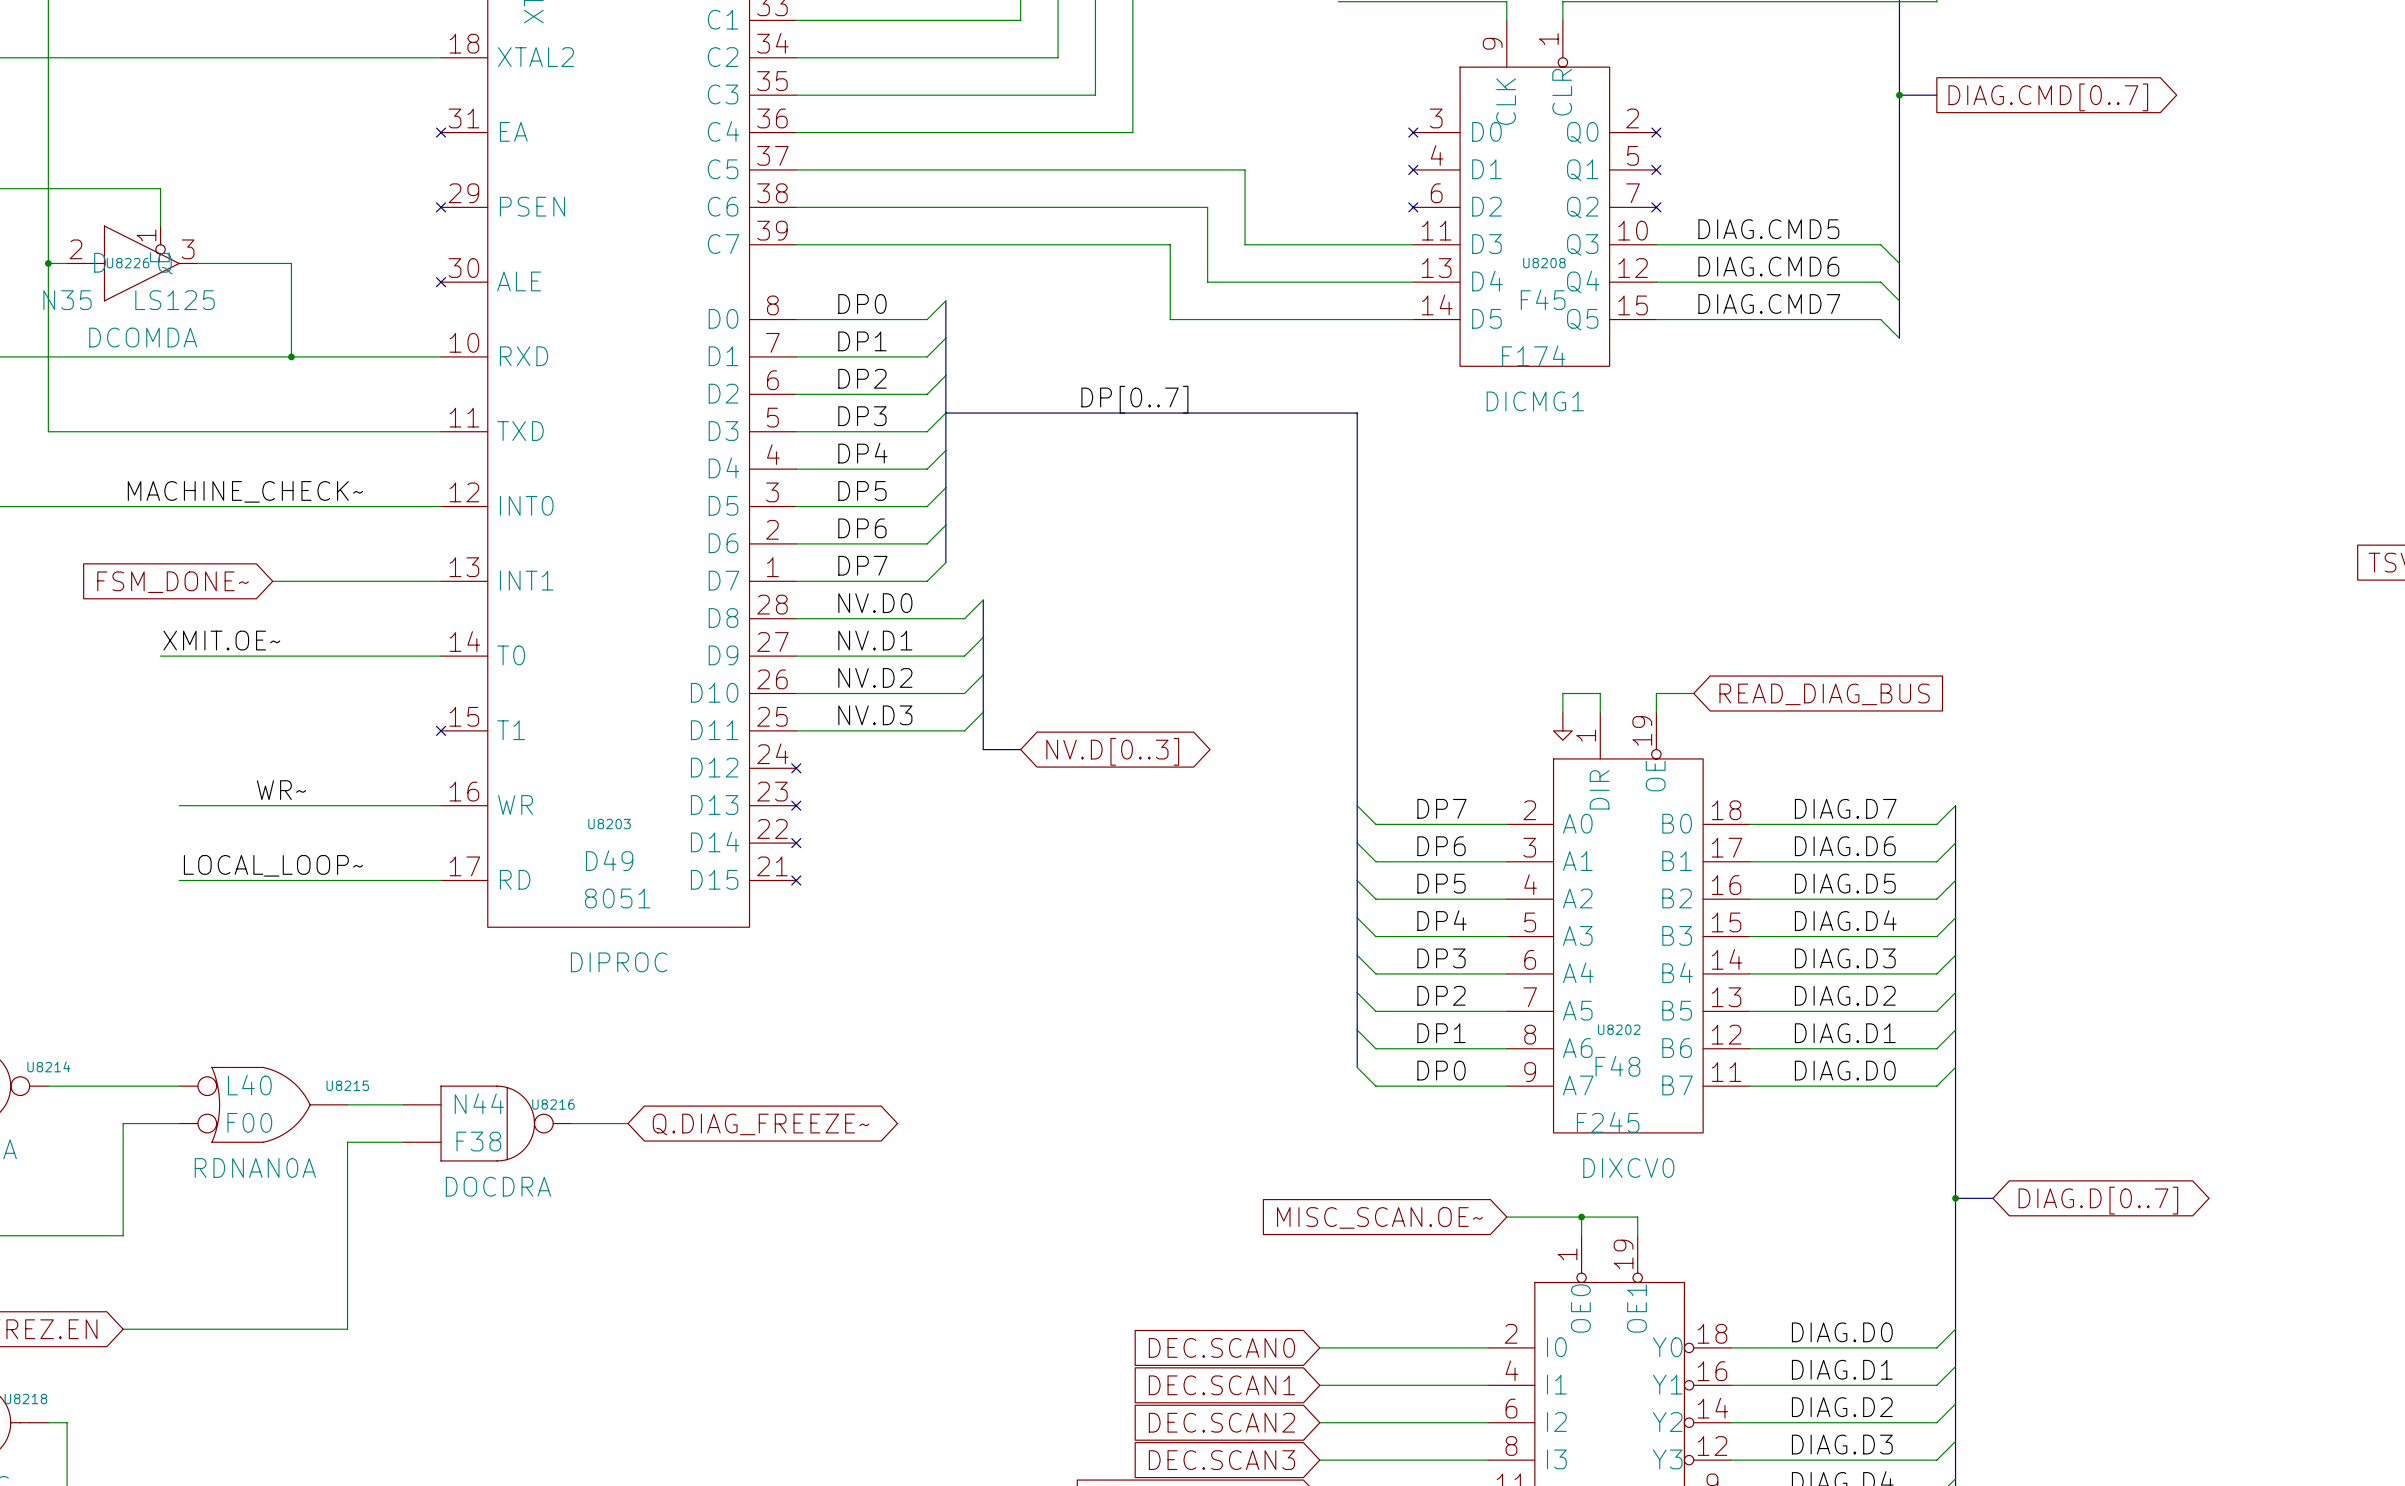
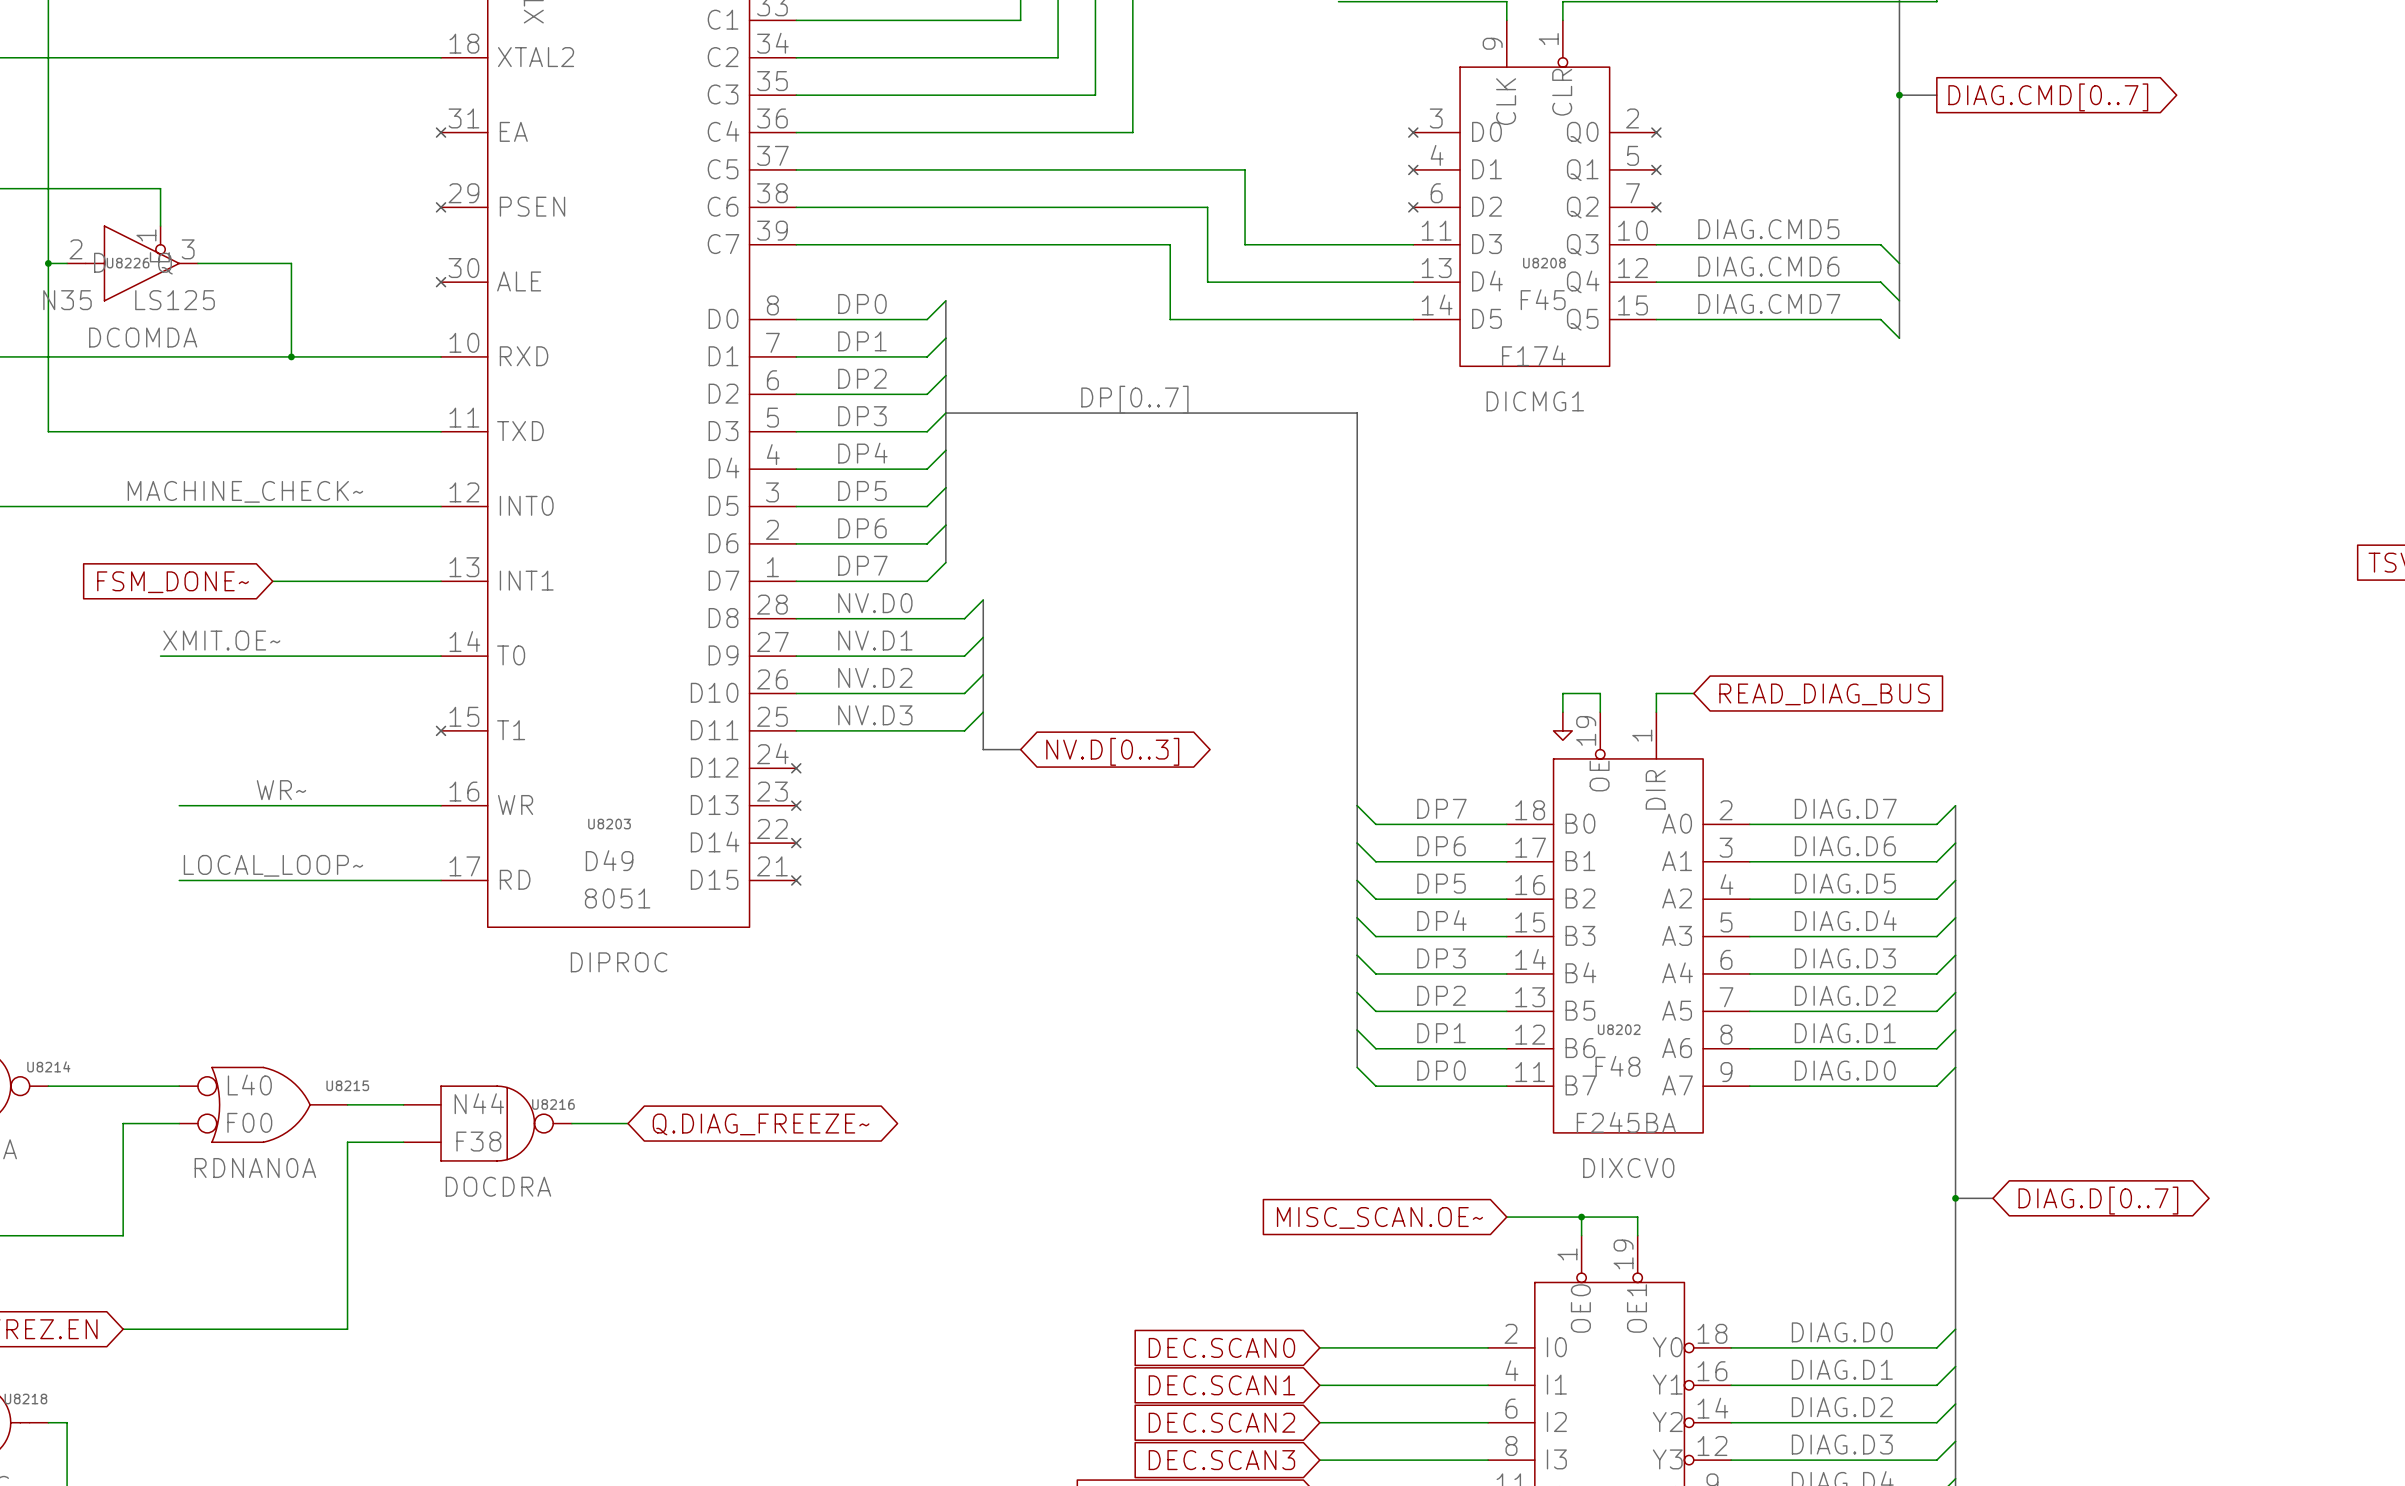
U8202 flip: as is (1628, 941) -> left-right (1628, 941)
U8202 value: F245 (1608, 1122) -> F245BA (1626, 1122)

